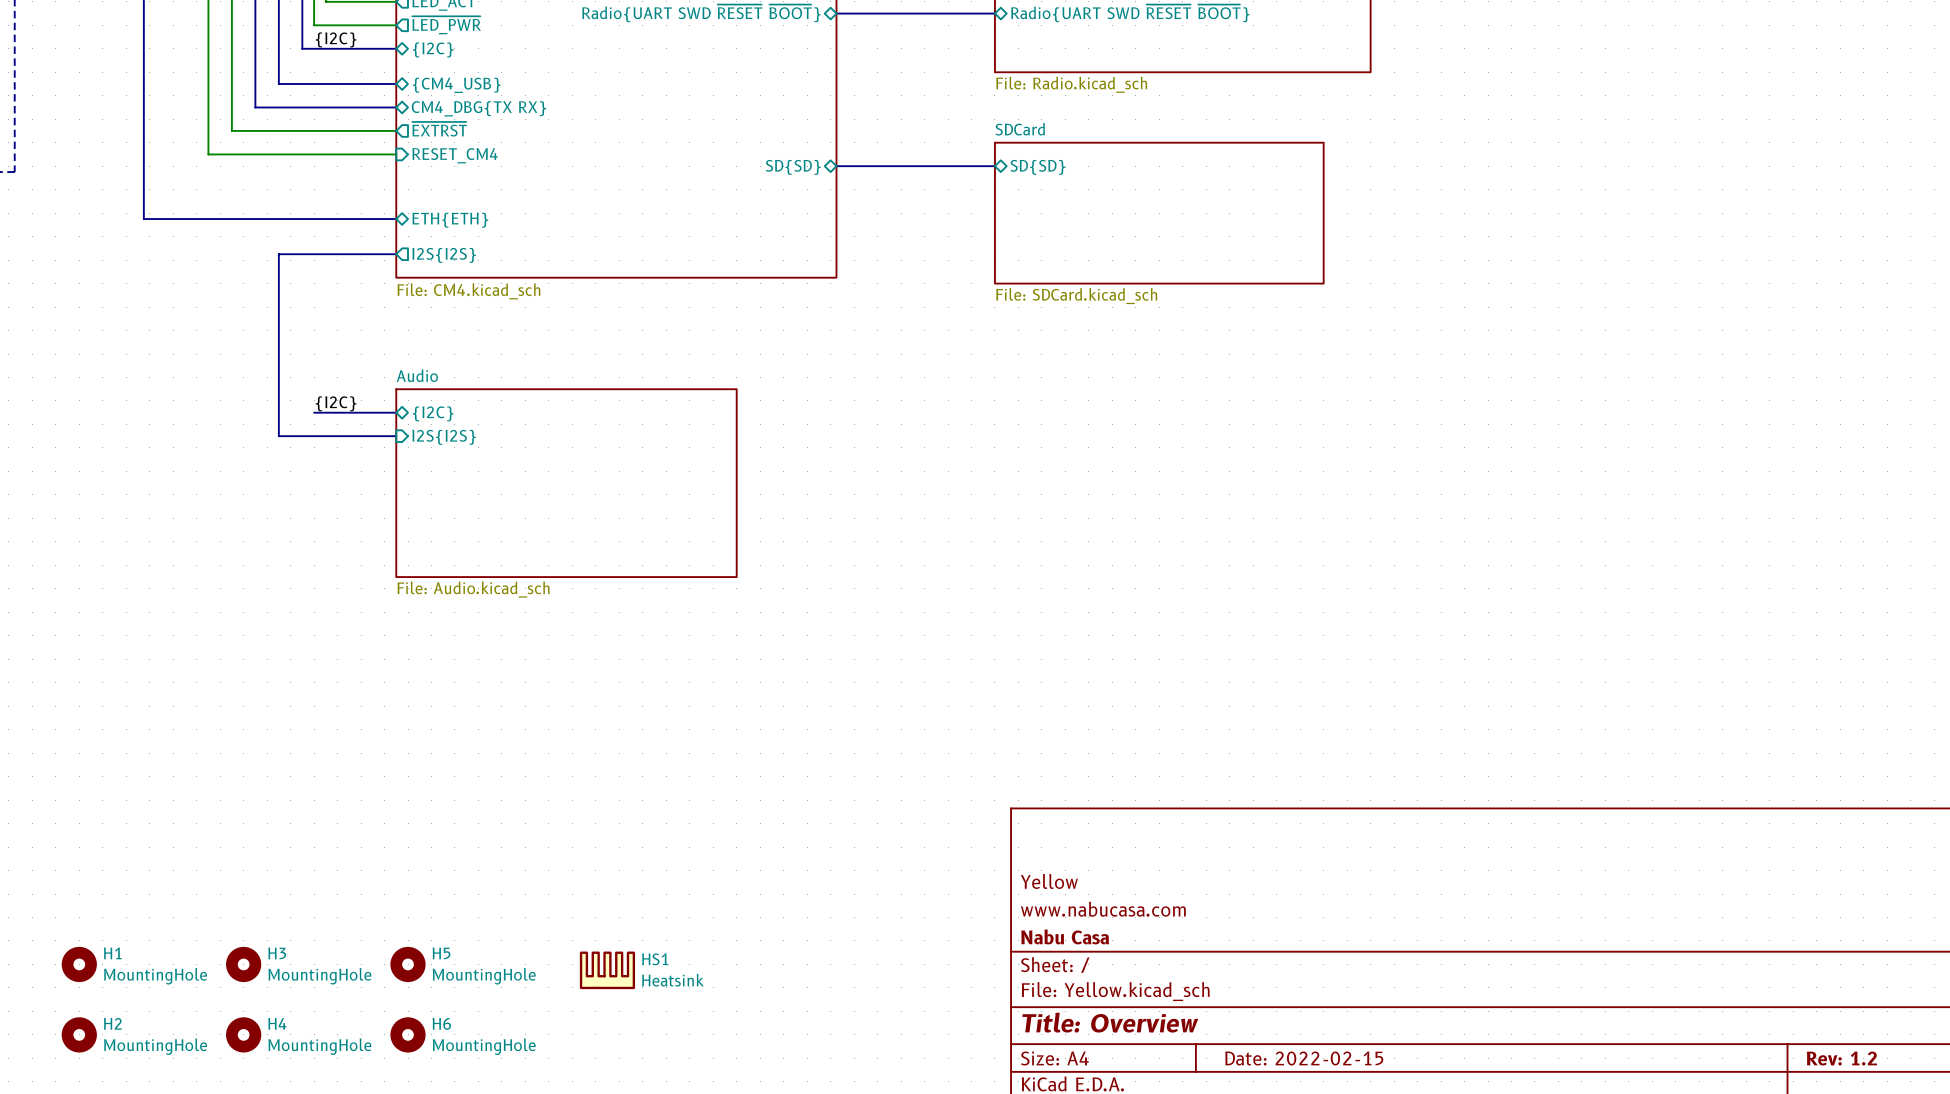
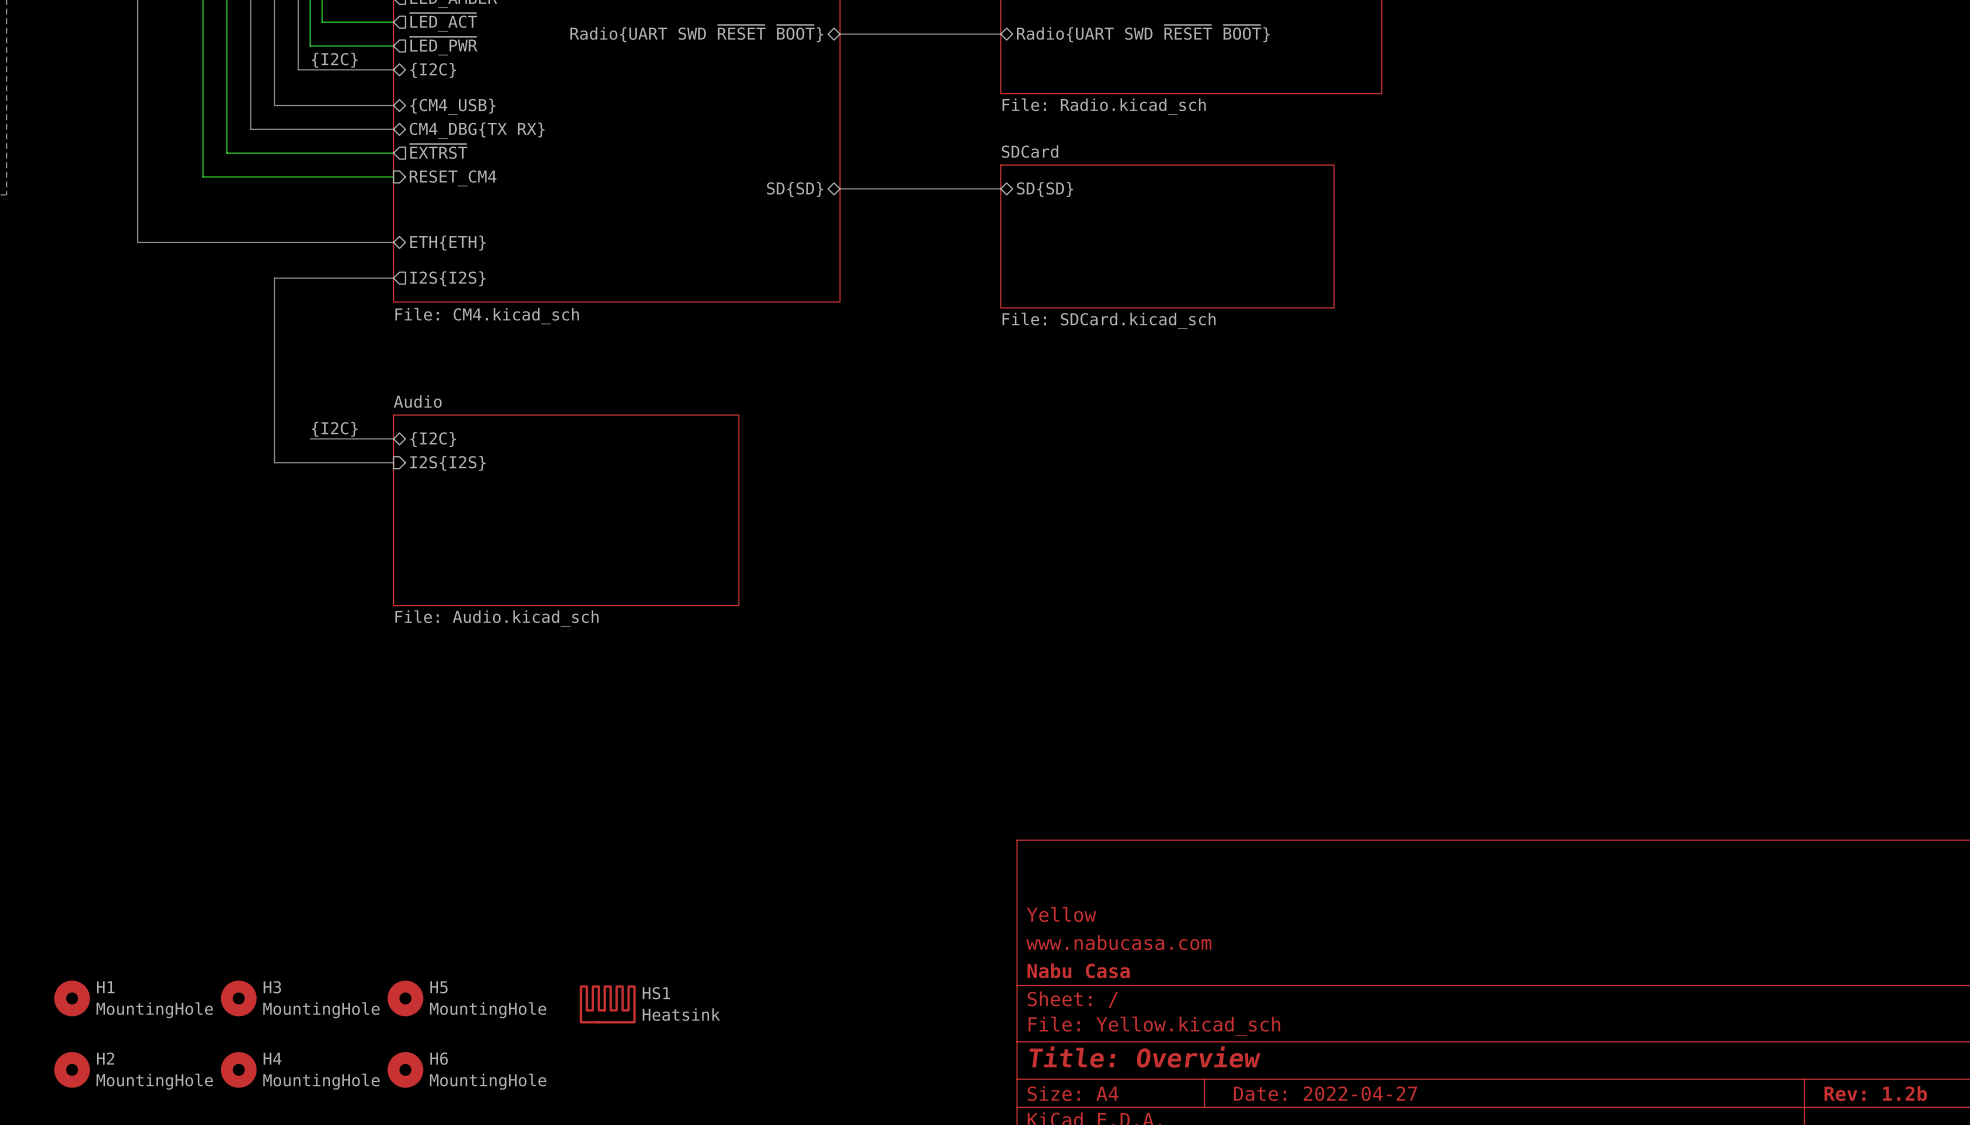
title block: Date: 2022-02-15 (1304, 1058) -> Date: 2022-04-27 (1325, 1093)
title block: Rev: 1.2 (1841, 1058) -> Rev: 1.2b (1875, 1093)

